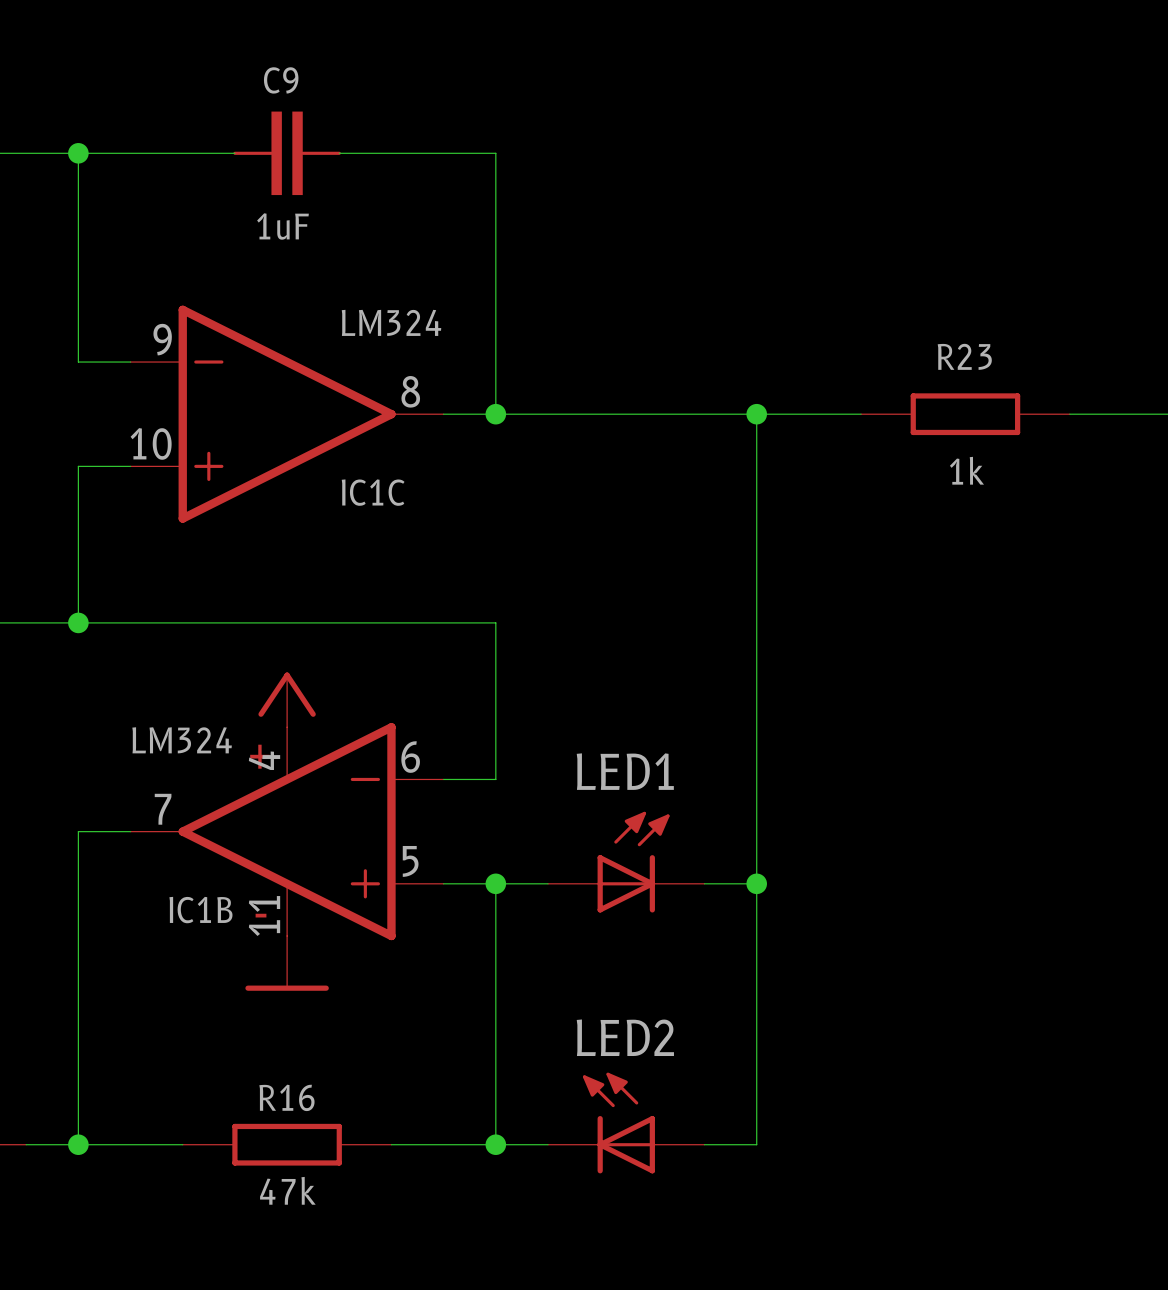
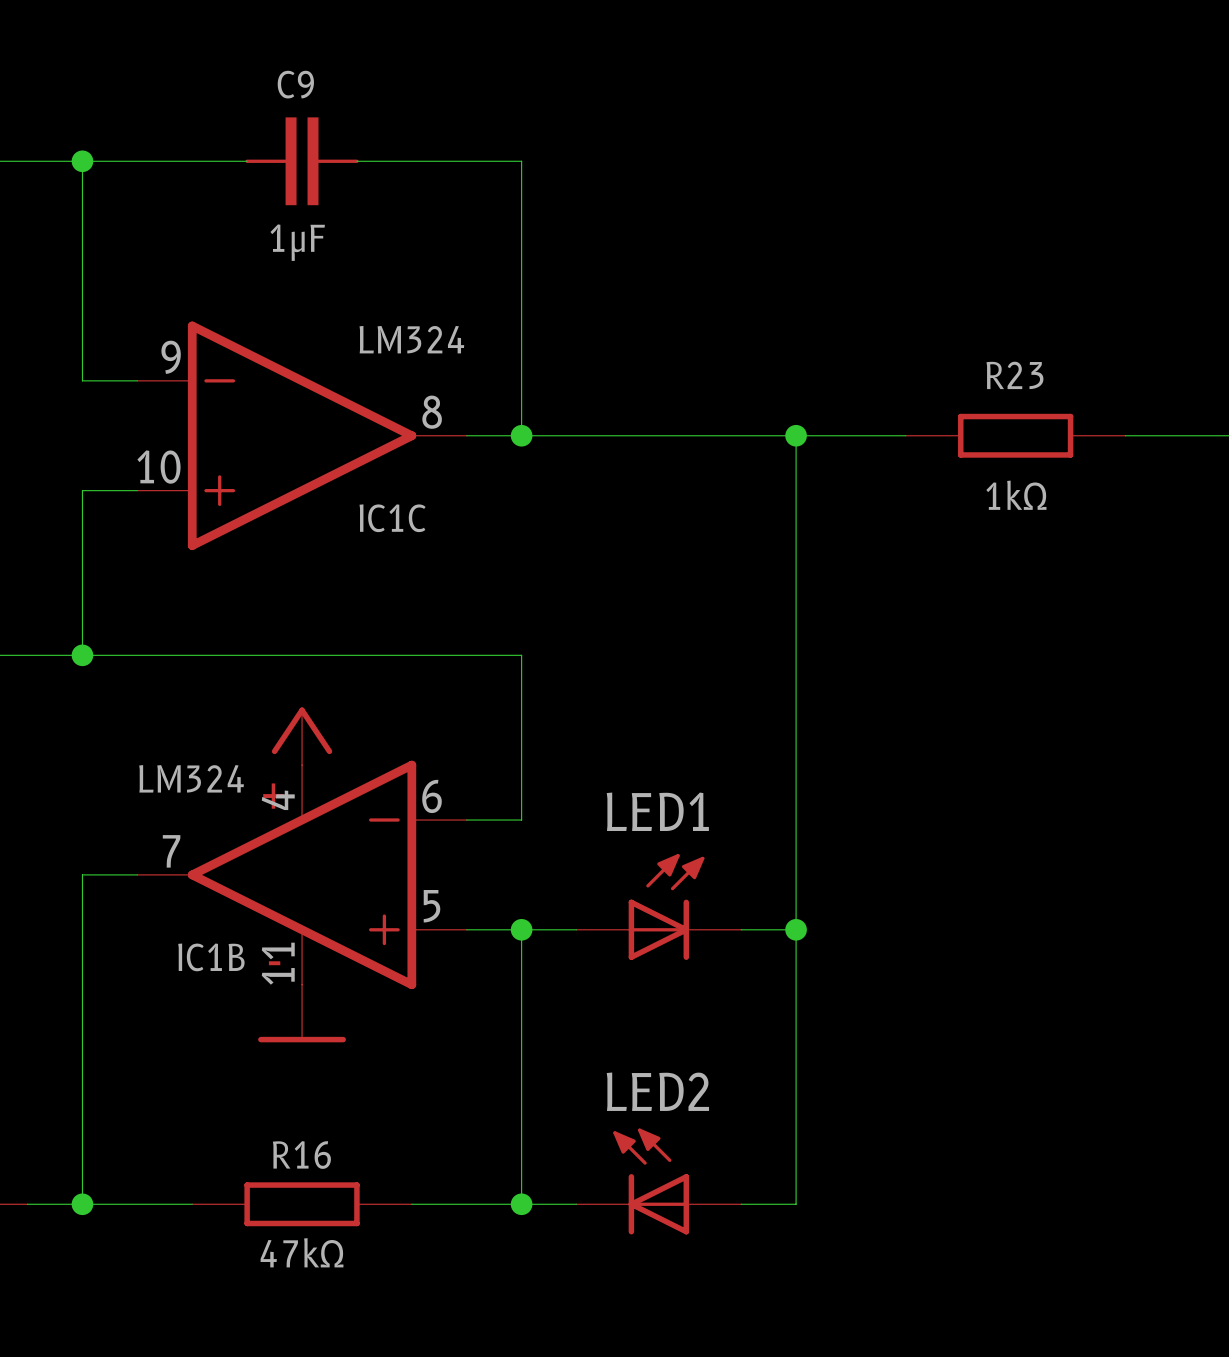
C9 value: 1uF (282, 226) -> 1μF (297, 242)
R23 value: 1k (966, 470) -> 1kΩ (1016, 495)
R16 value: 47k (287, 1190) -> 47kΩ (302, 1252)

